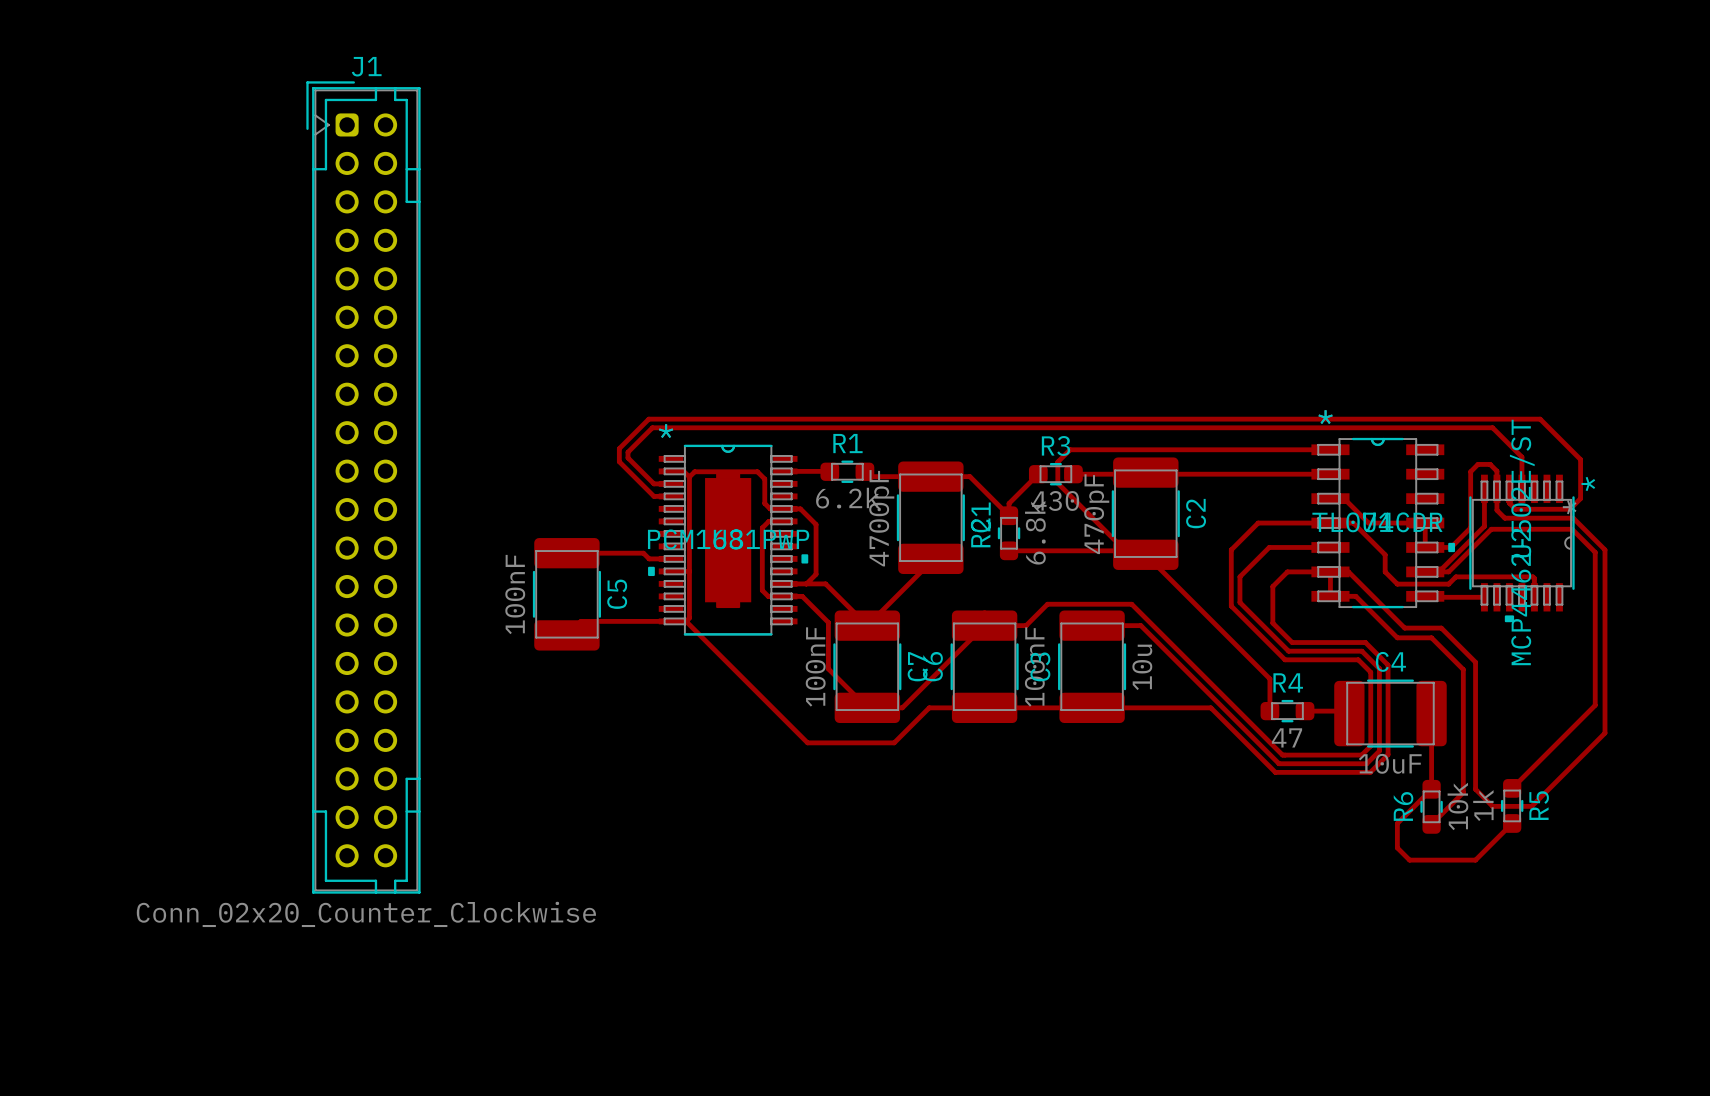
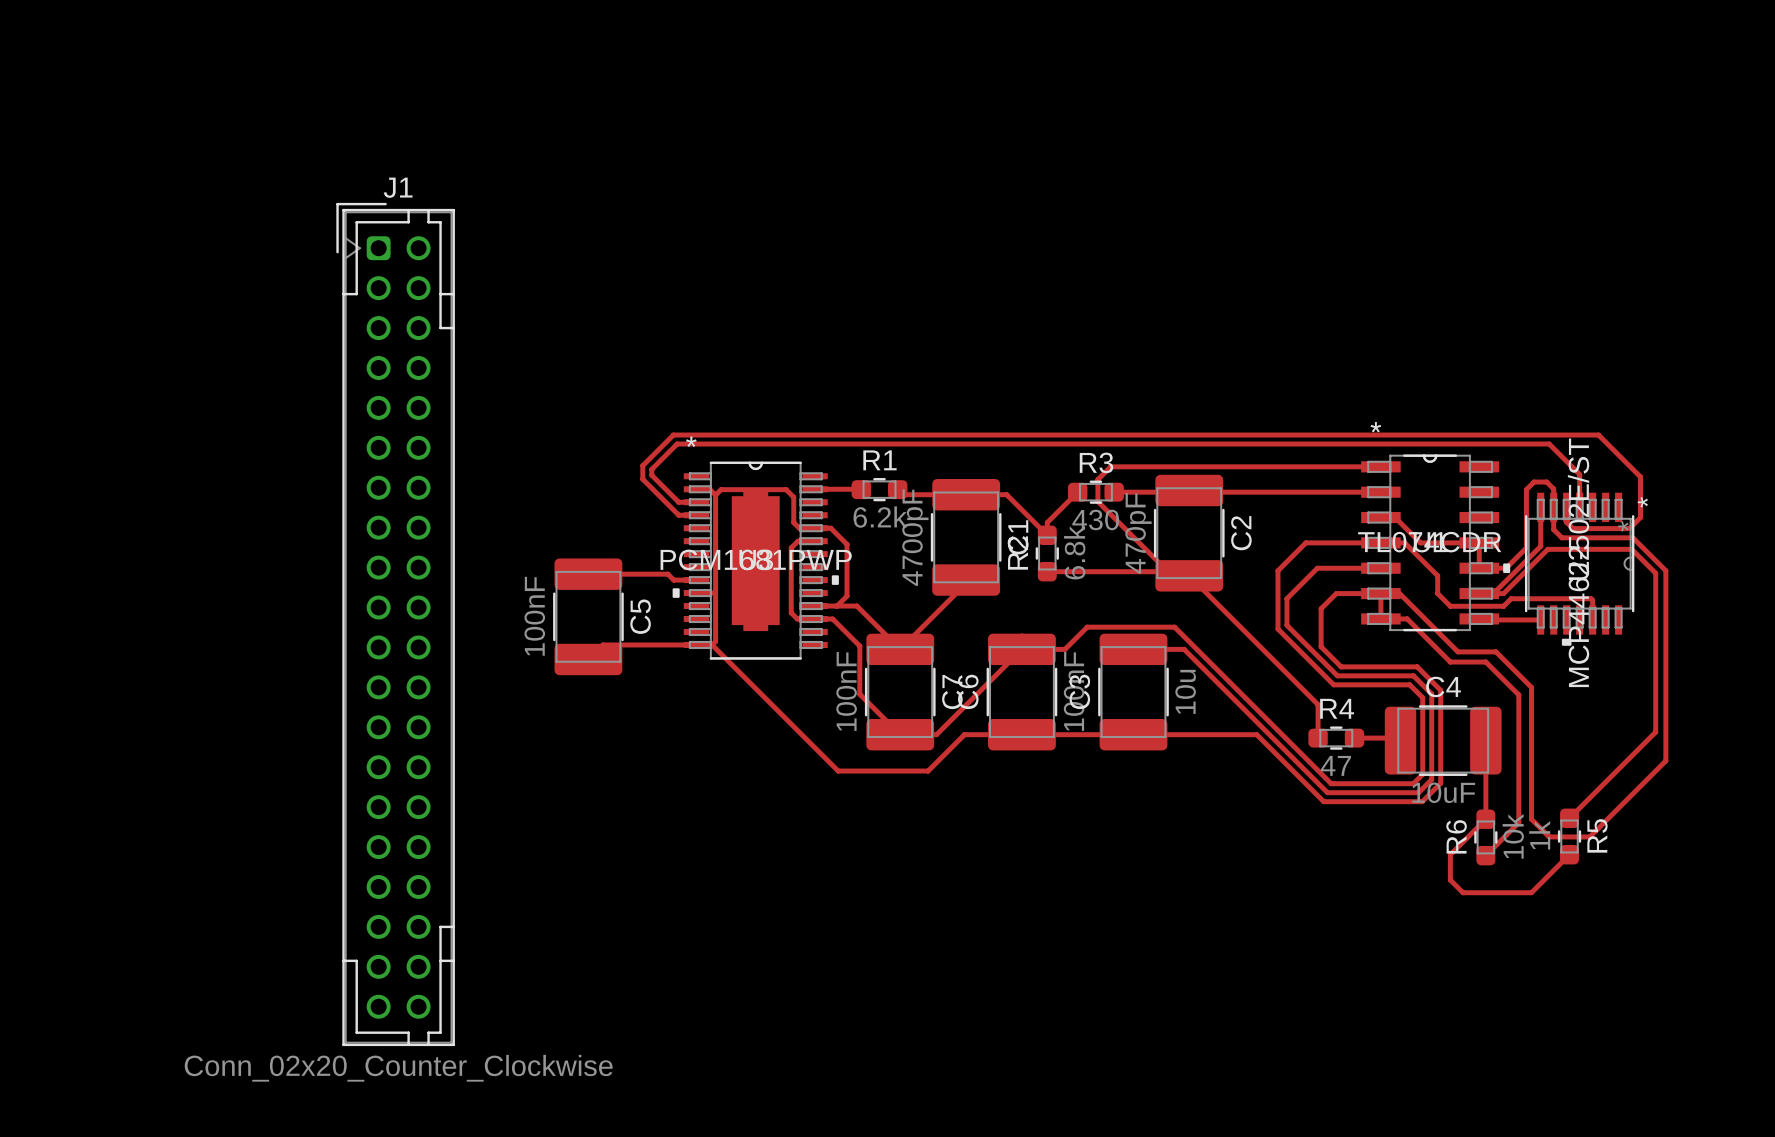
J1 position: (363, 487) -> (395, 624)

